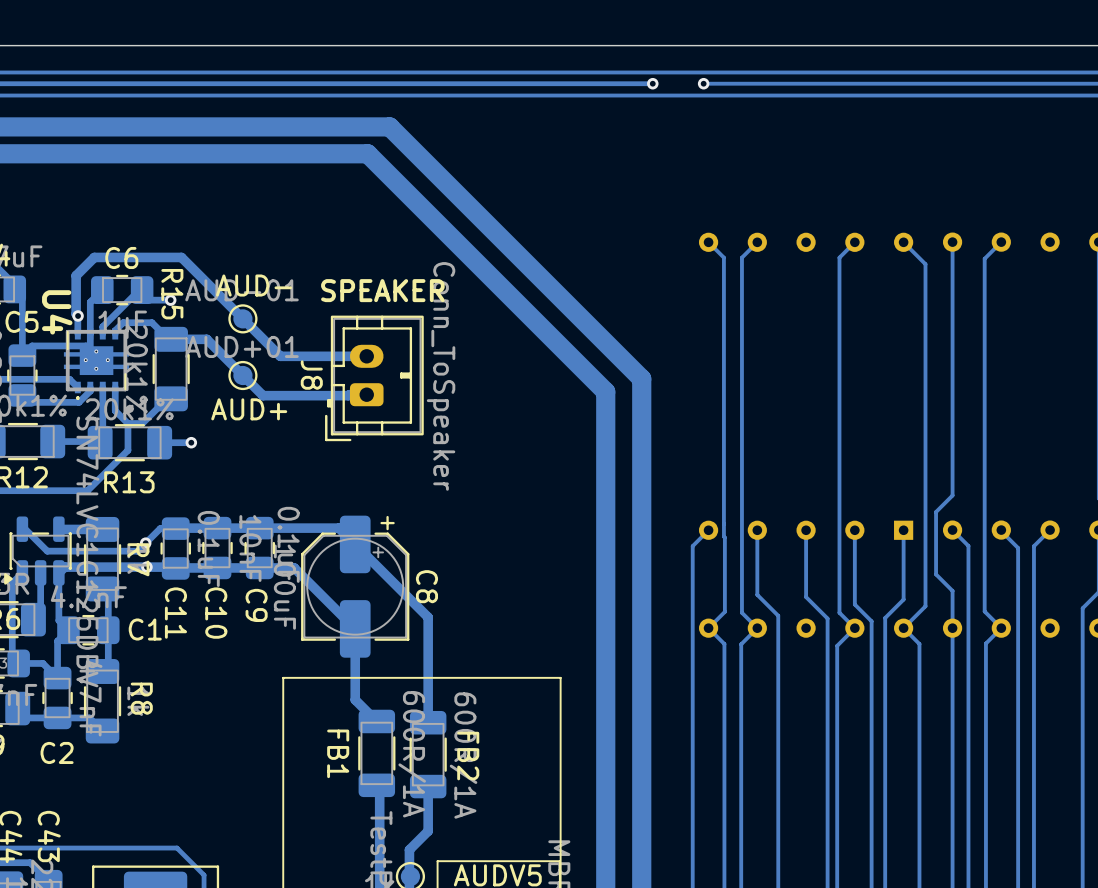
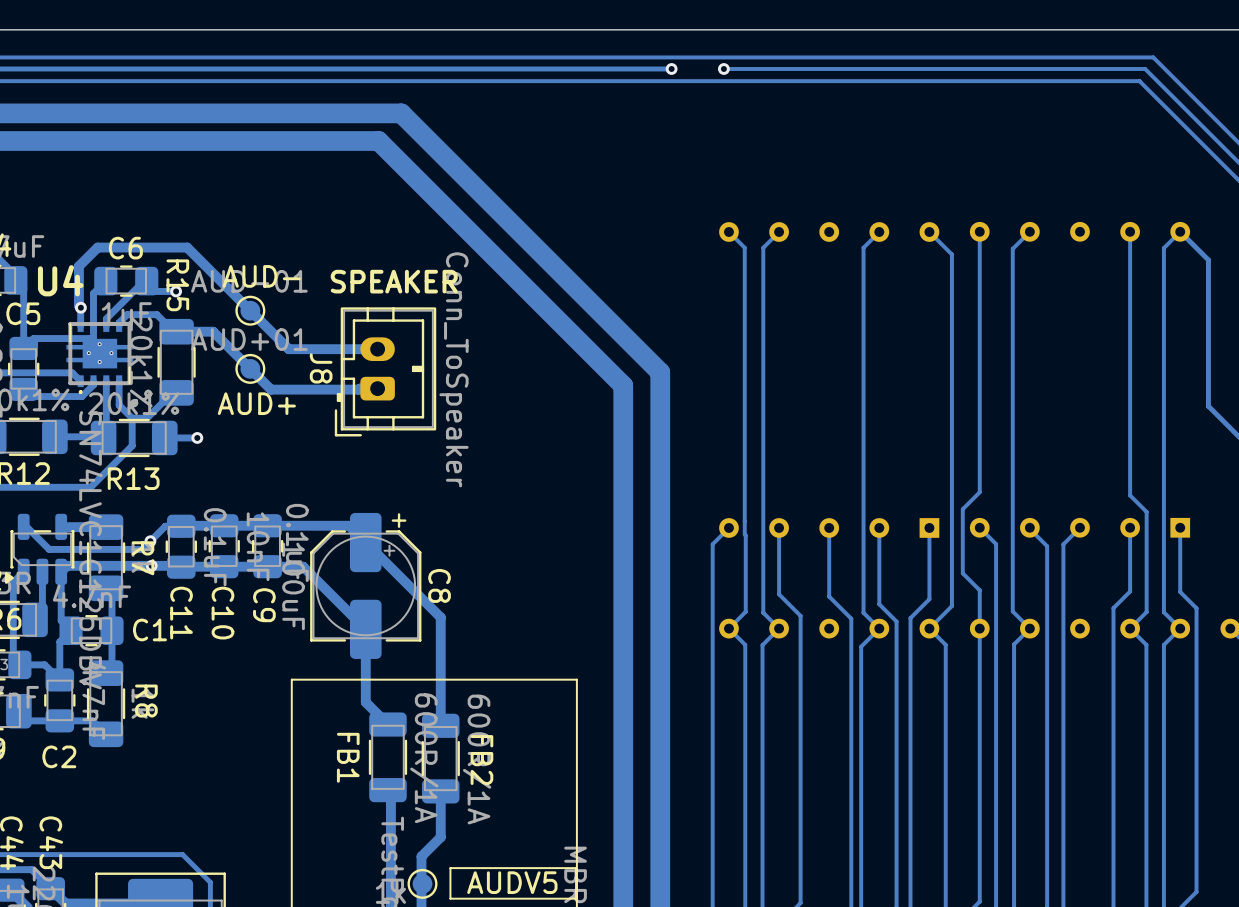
U4 name rotation: 0° (57, 312) -> 90° counterclockwise (60, 280)

